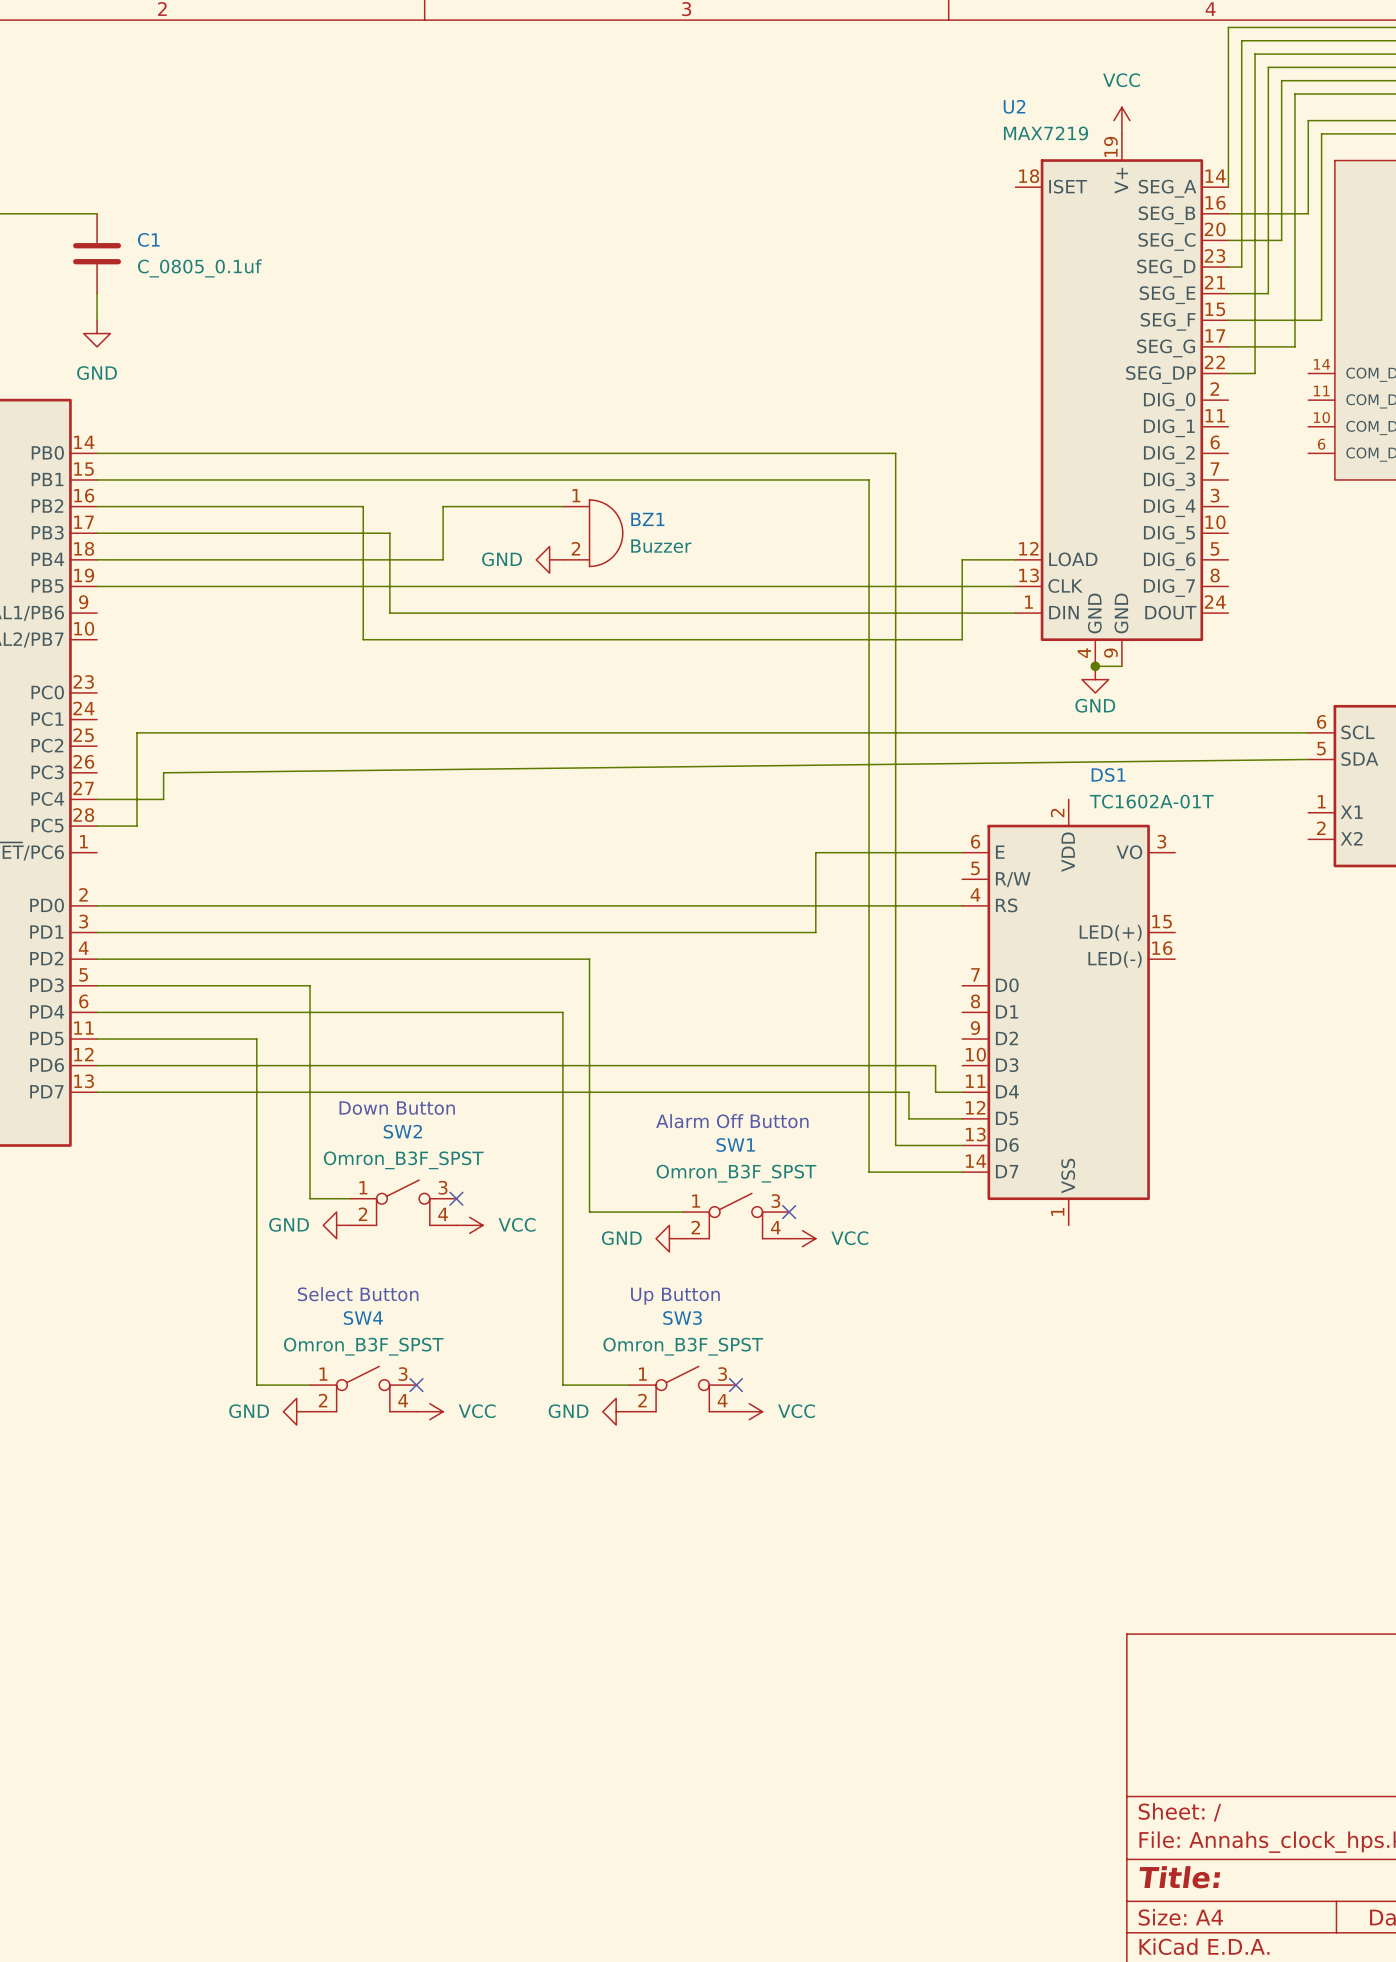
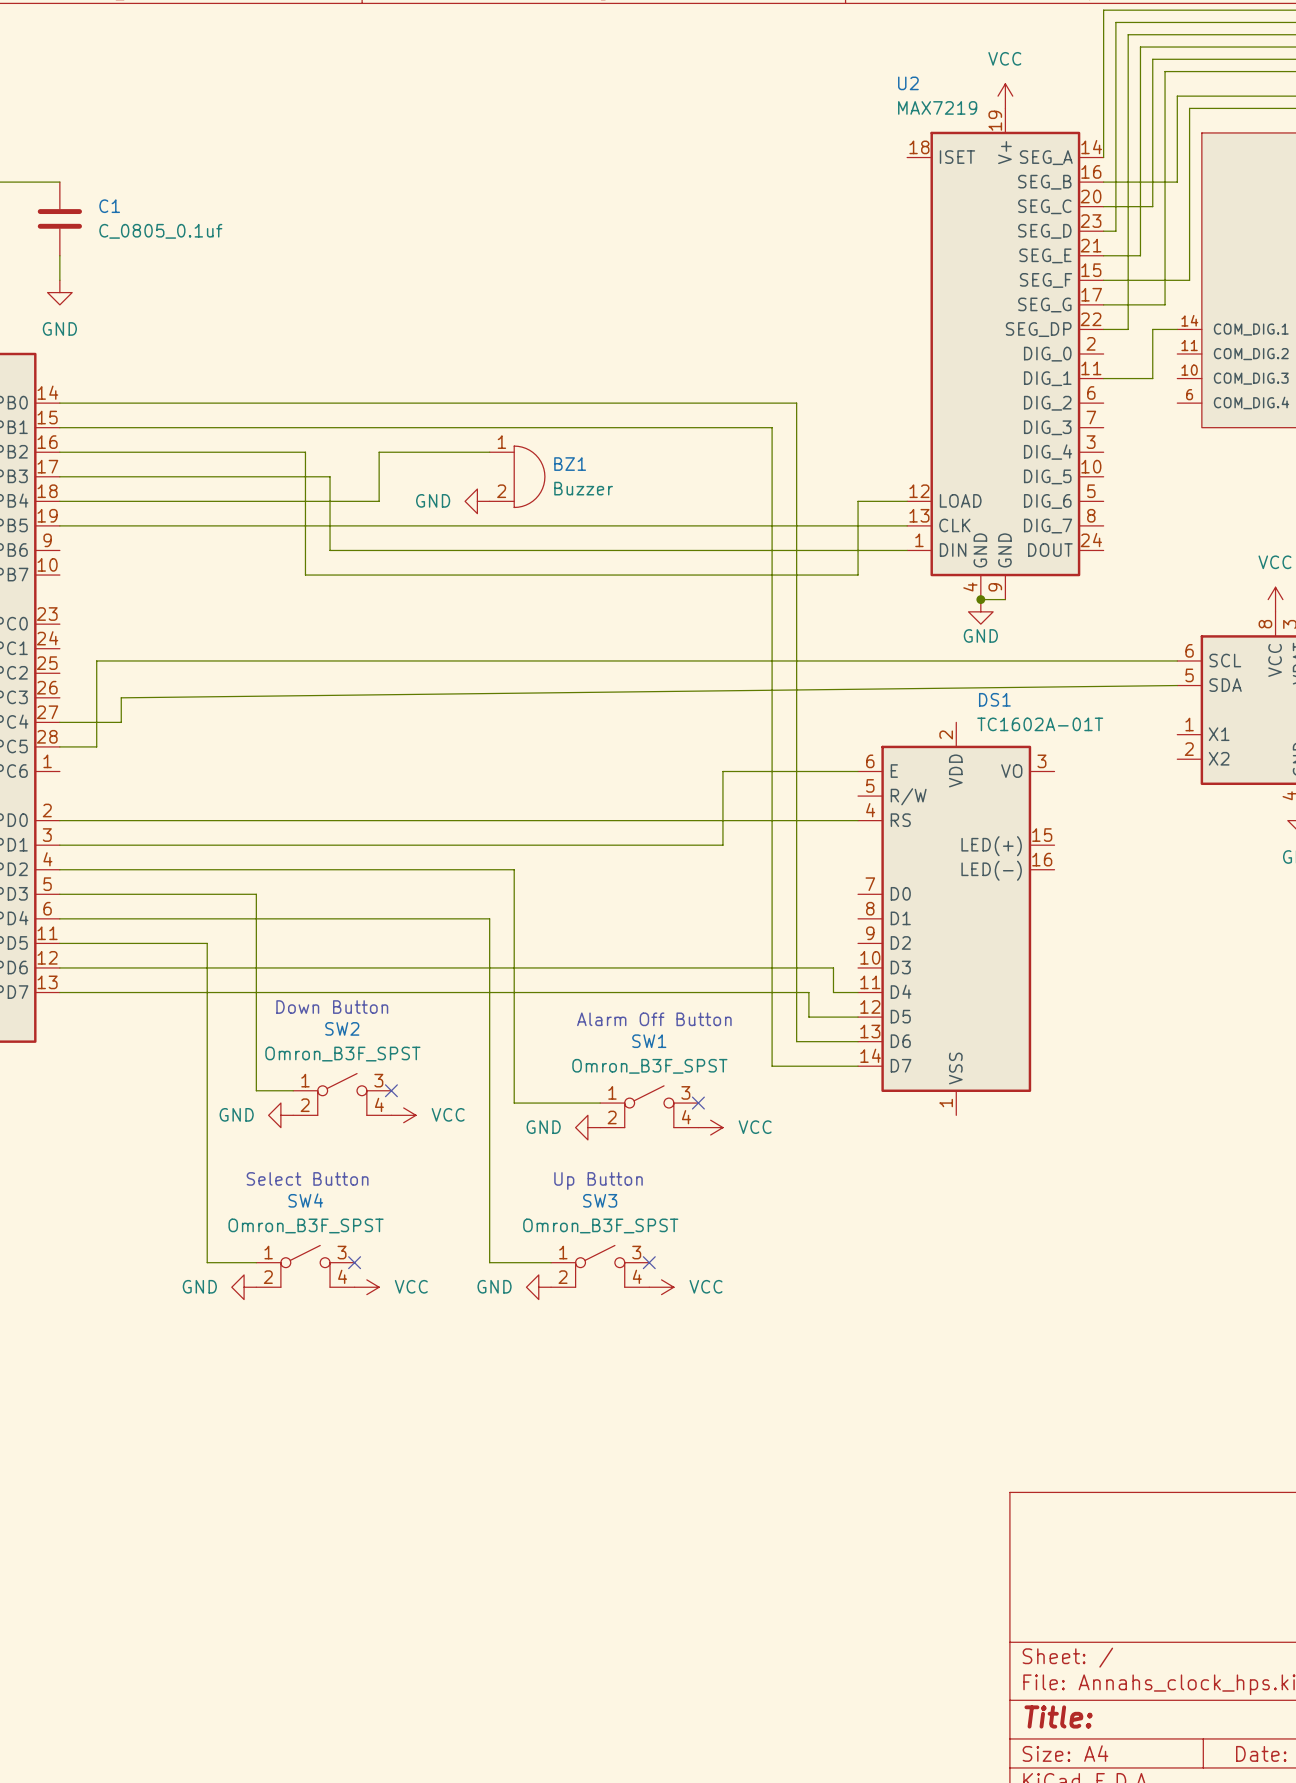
wire: none -> (1177, 329) (1152, 329) (1152, 378) (1103, 378)

